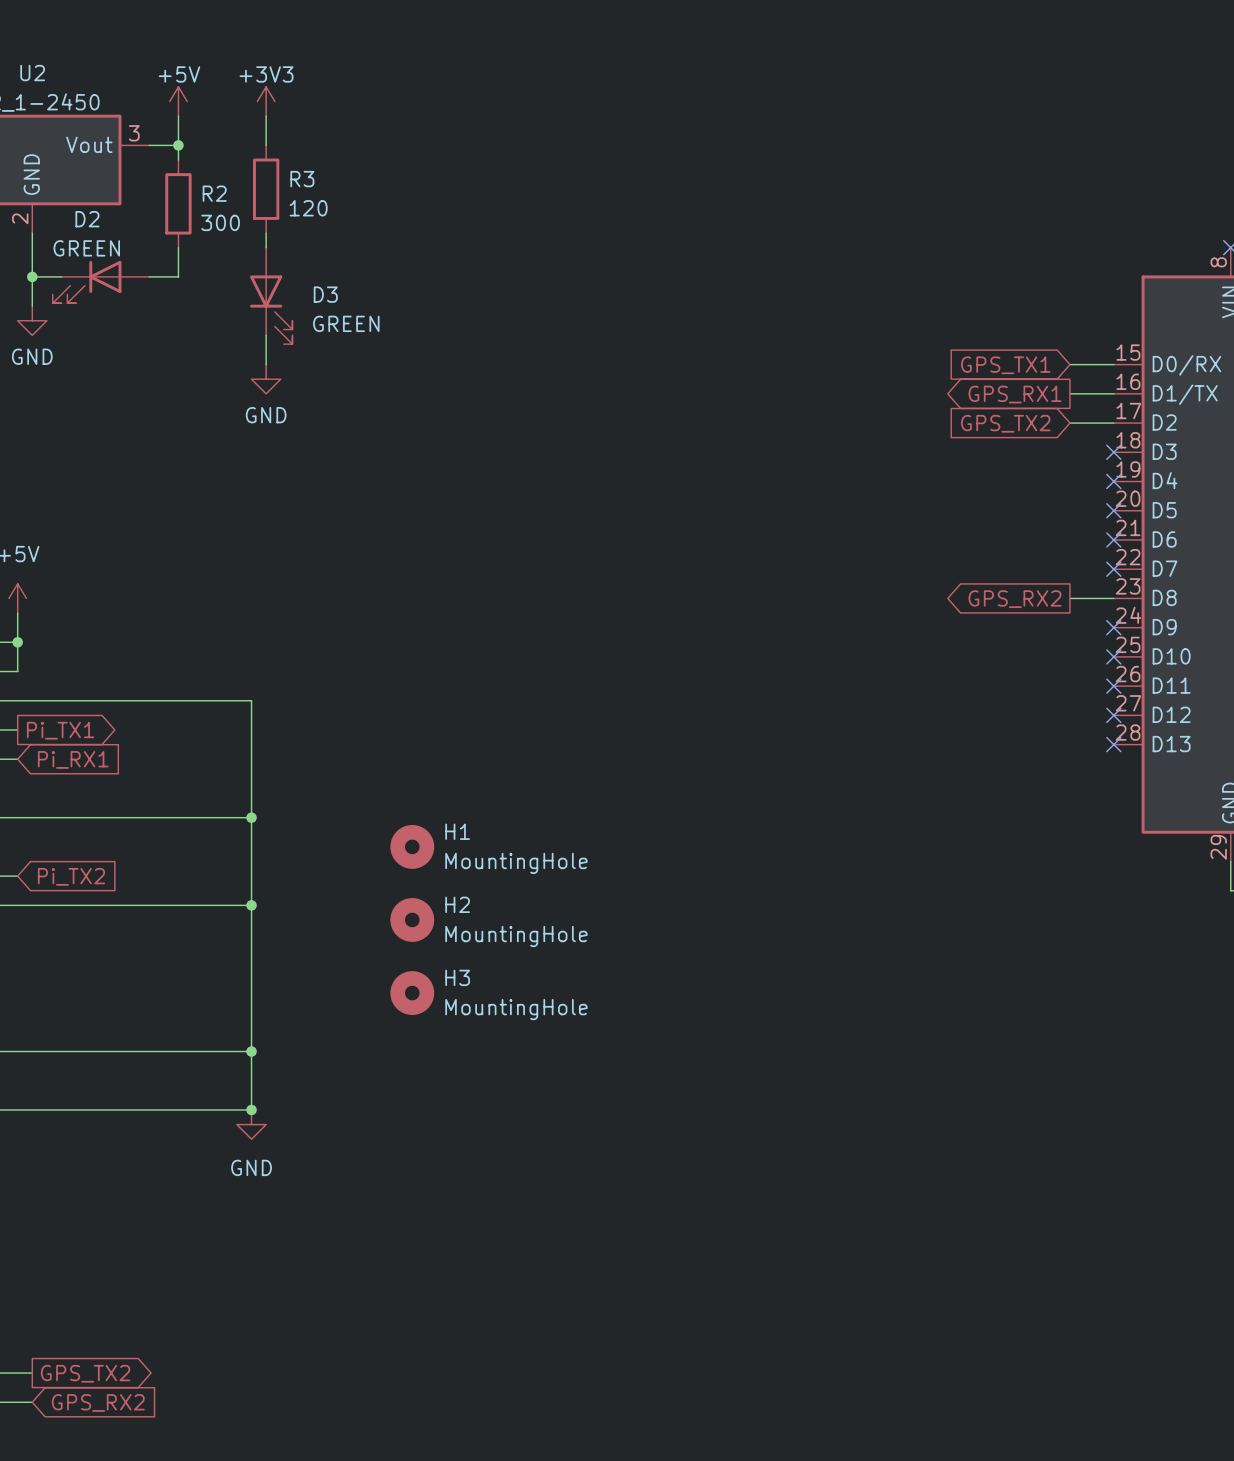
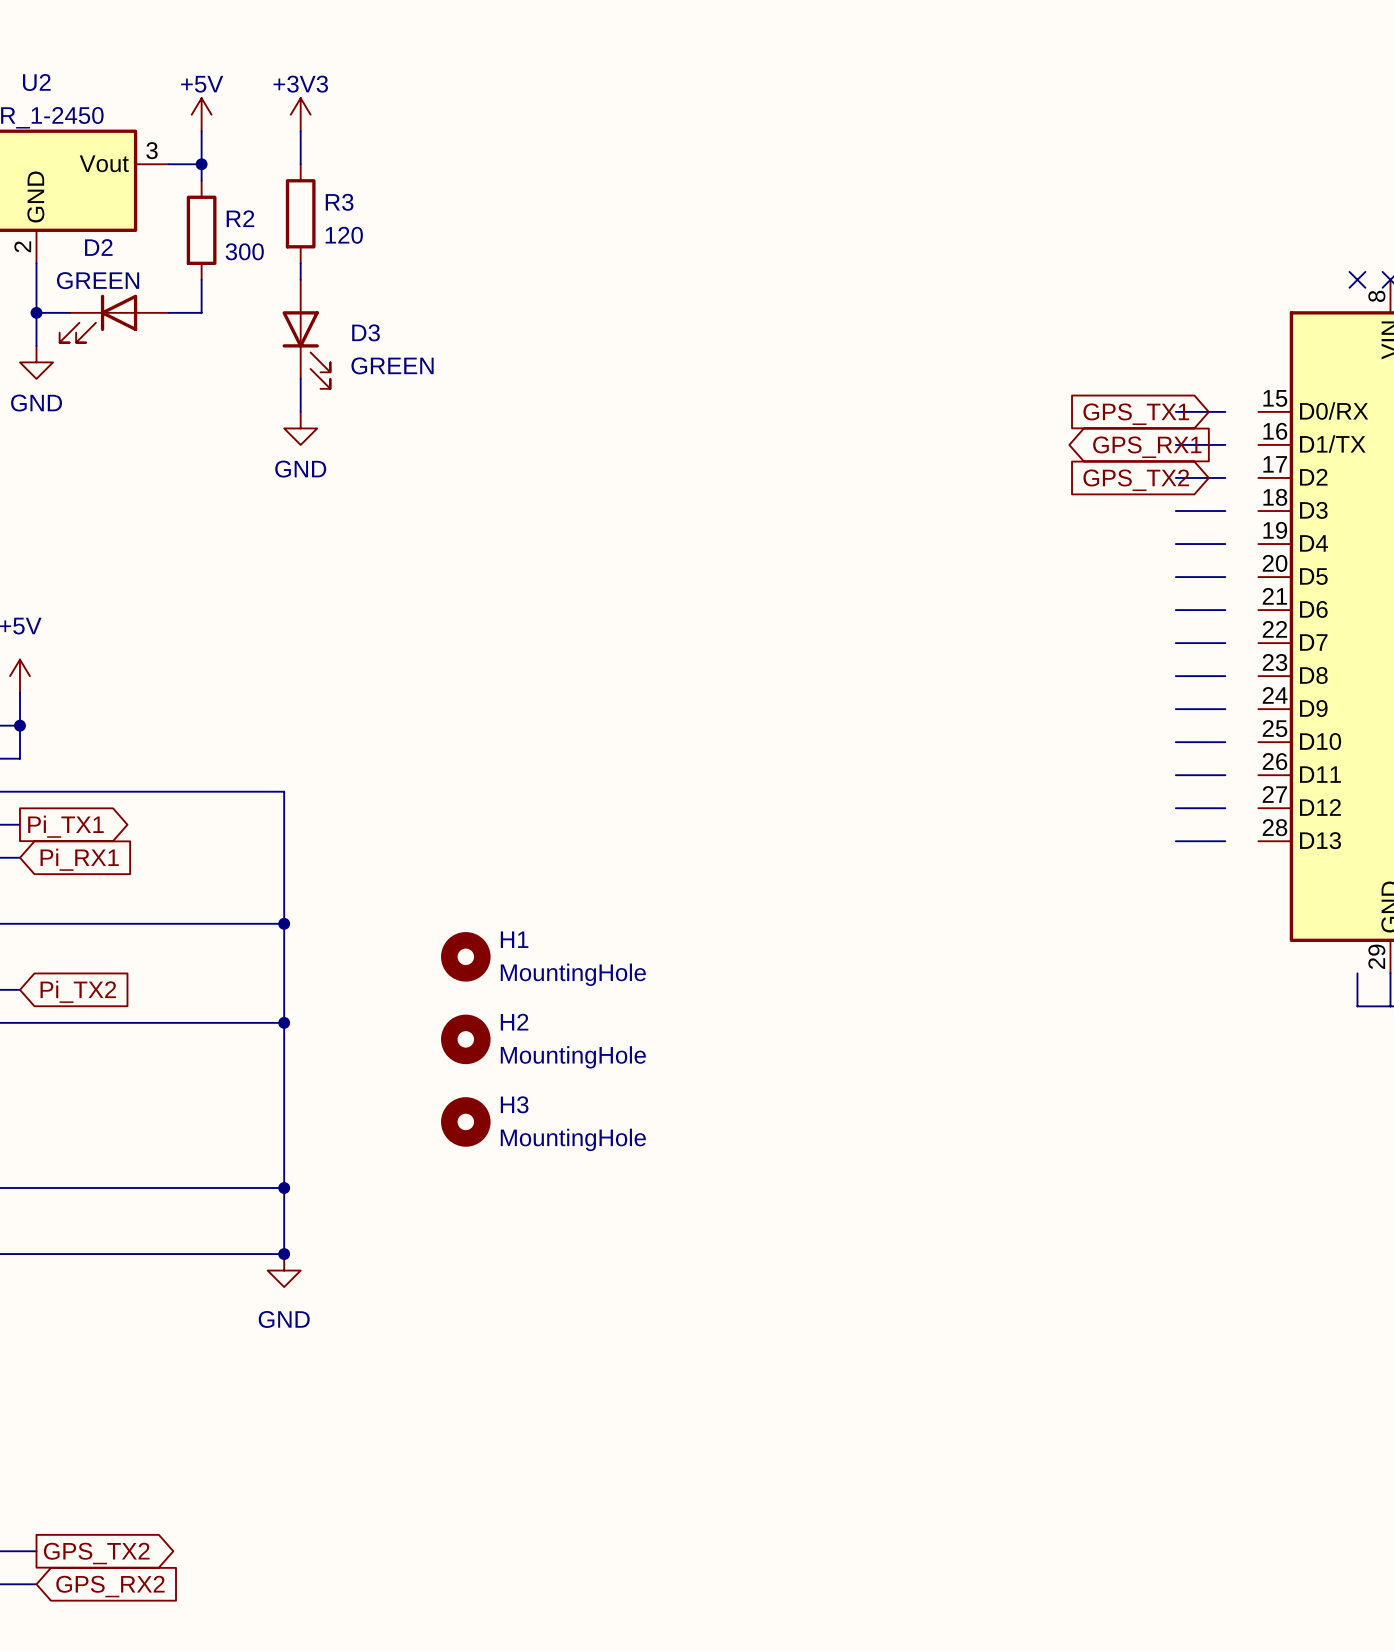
no-connect mark: none -> (1357, 279)
wire: (1084, 364) (1113, 364) -> (1175, 411) (1208, 411)
wire: (1084, 393) (1113, 393) -> (1175, 444) (1208, 444)
wire: (1084, 423) (1113, 423) -> (1175, 477) (1208, 477)
wire: none -> (1175, 511) (1225, 511)
no-connect mark: (1113, 452) -> none
wire: none -> (1175, 544) (1225, 544)
no-connect mark: (1113, 481) -> none
wire: none -> (1175, 577) (1225, 577)
no-connect mark: (1113, 510) -> none
wire: none -> (1175, 610) (1225, 610)
no-connect mark: (1113, 539) -> none
wire: none -> (1175, 643) (1225, 643)
no-connect mark: (1113, 569) -> none
wire: (1084, 598) (1113, 598) -> (1175, 676) (1208, 676)
global label: GPS_RX2 (1014, 599) -> none
wire: none -> (1175, 709) (1225, 709)
no-connect mark: (1113, 627) -> none
wire: none -> (1175, 742) (1225, 742)
no-connect mark: (1113, 656) -> none
wire: none -> (1175, 775) (1225, 775)
no-connect mark: (1113, 686) -> none
wire: none -> (1175, 808) (1225, 808)
no-connect mark: (1113, 715) -> none
wire: none -> (1175, 841) (1225, 841)
no-connect mark: (1113, 744) -> none
wire: none -> (1357, 973) (1357, 1006) (1390, 1006)

